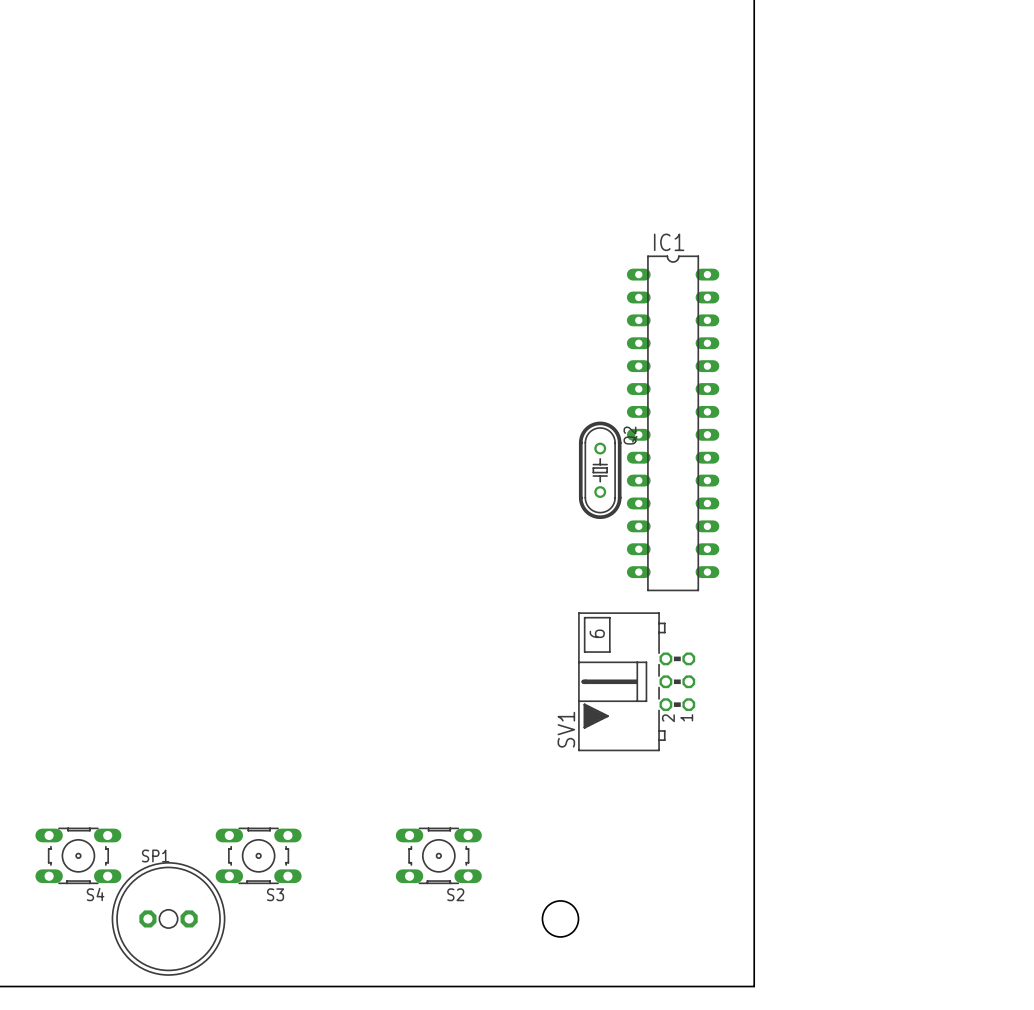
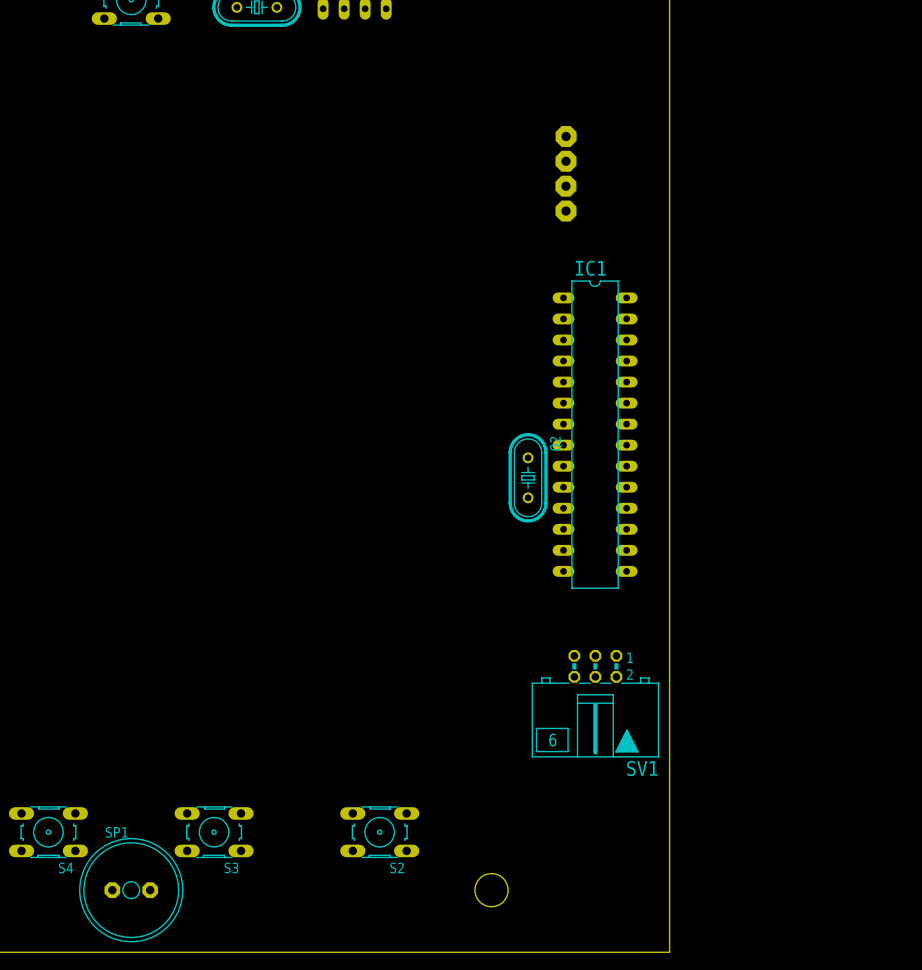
part: none -> (566, 136)
part: none -> (565, 161)
part: none -> (565, 186)
part: none -> (565, 211)
SV1 footprint: [578, 612, 696, 752] -> [531, 649, 660, 758]
SV1 name position: SV1 (566, 729) -> SV1 (642, 768)

